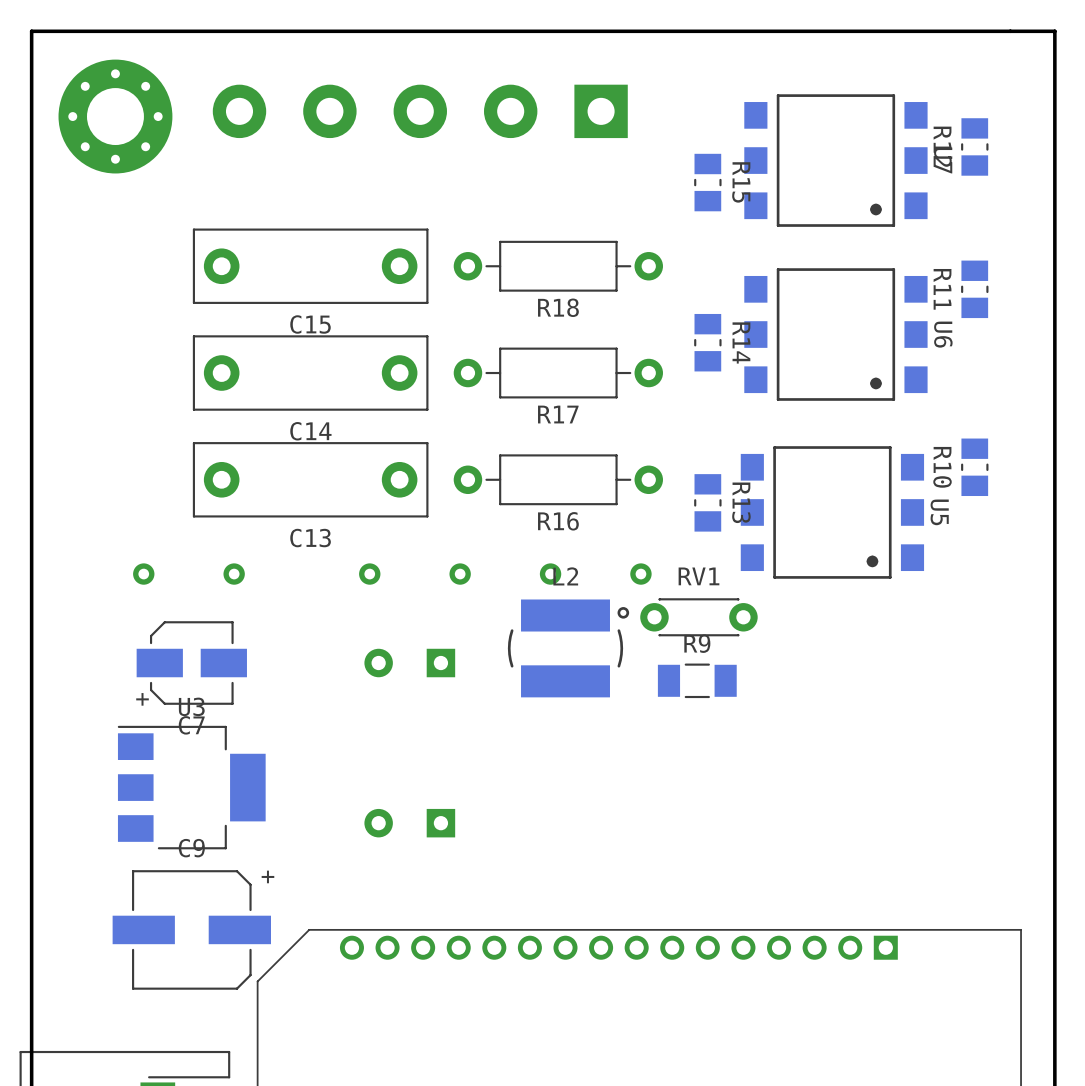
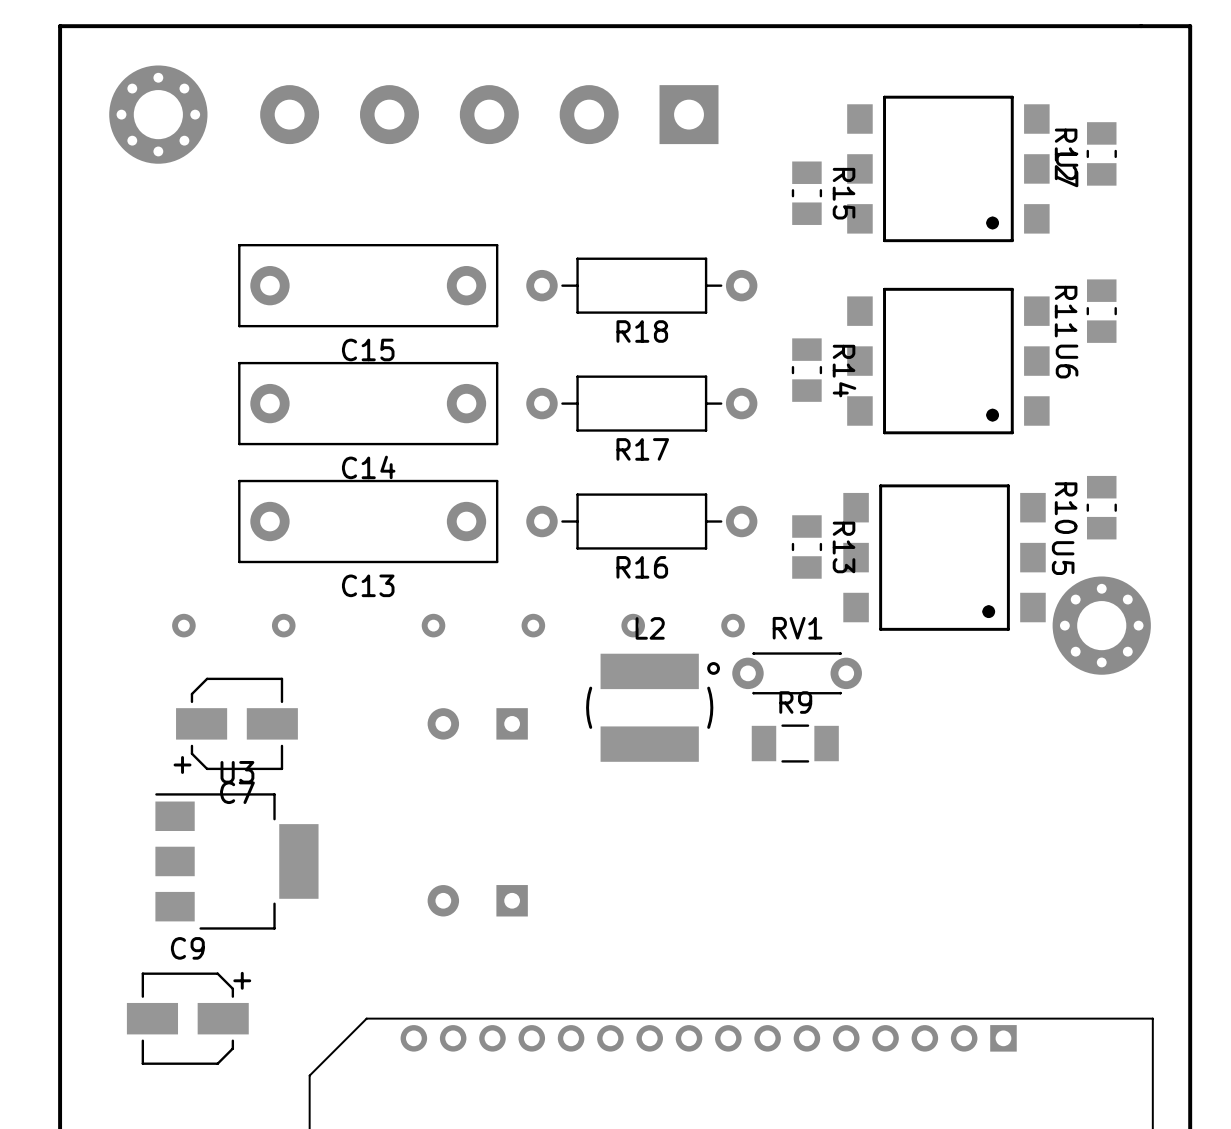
part footprint: [58, 59, 173, 174] -> [109, 65, 208, 164]
part: none -> (1101, 625)
C9 footprint: [112, 870, 271, 990] -> [126, 972, 249, 1065]

